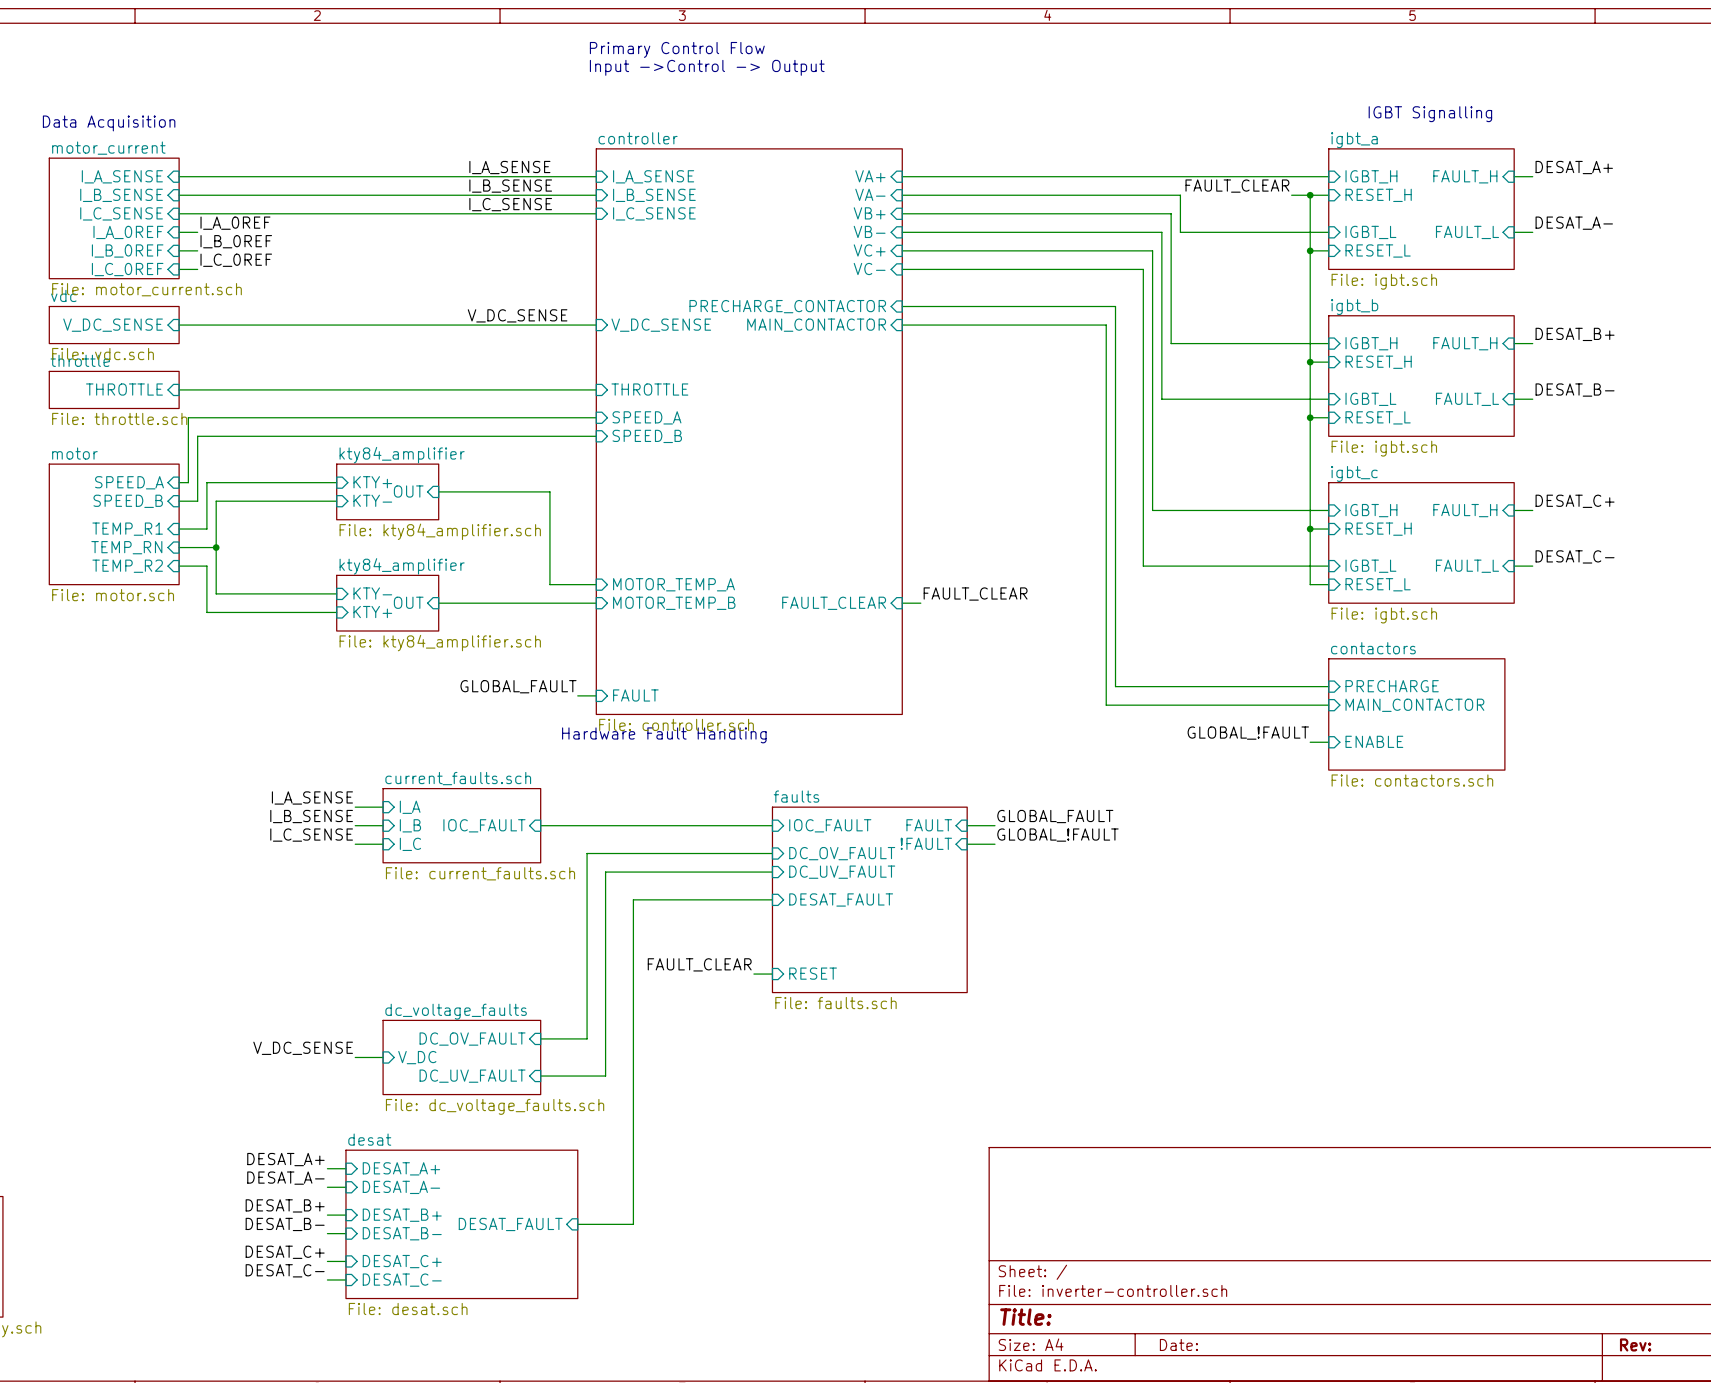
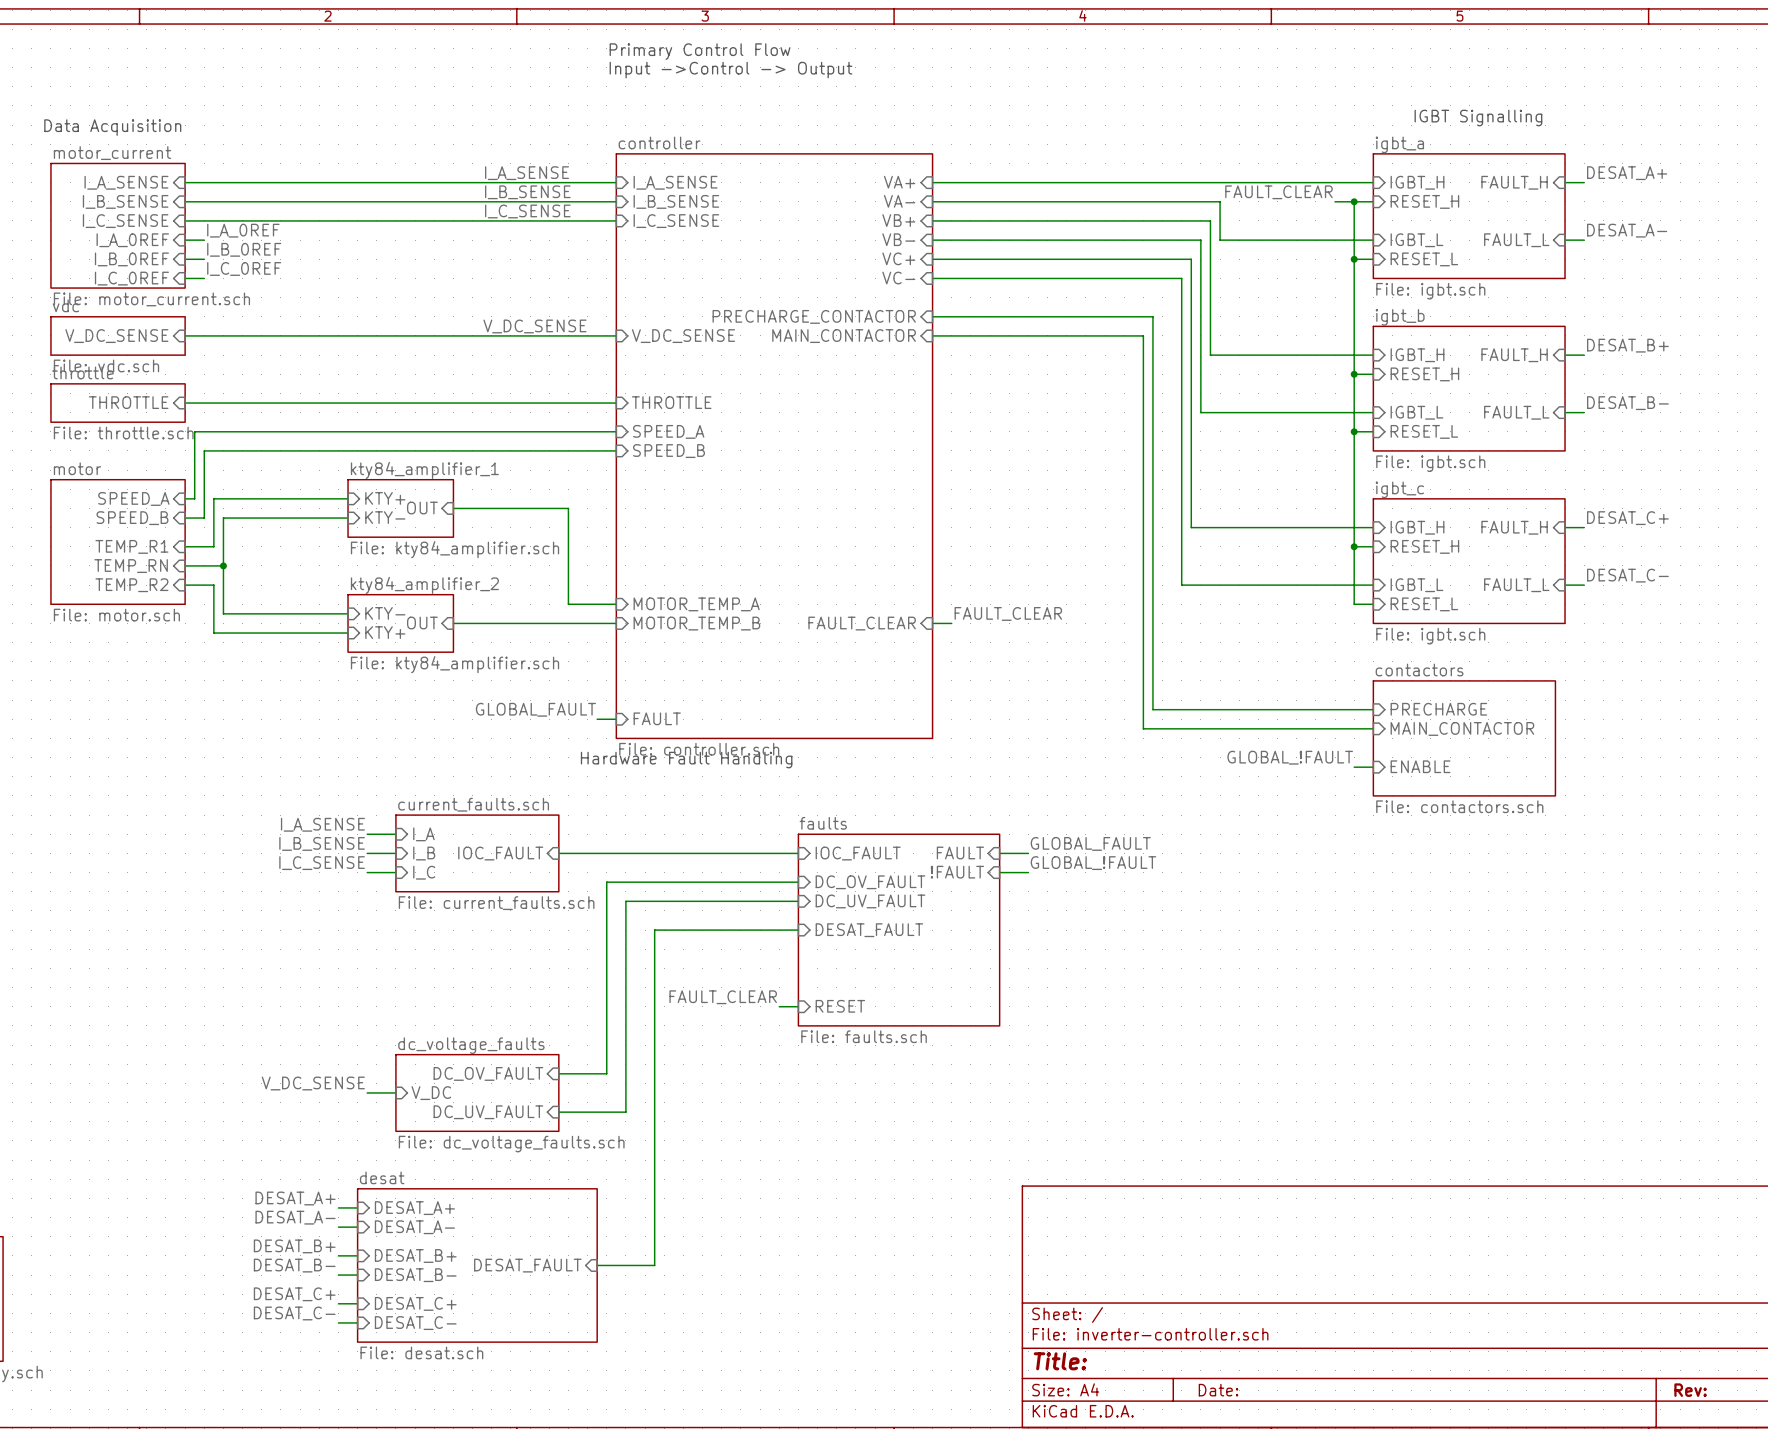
sheet kty84_amplifier name: kty84_amplifier (402, 455) -> kty84_amplifier_1 (424, 470)
sheet kty84_amplifier name: kty84_amplifier (402, 566) -> kty84_amplifier_2 (424, 585)

